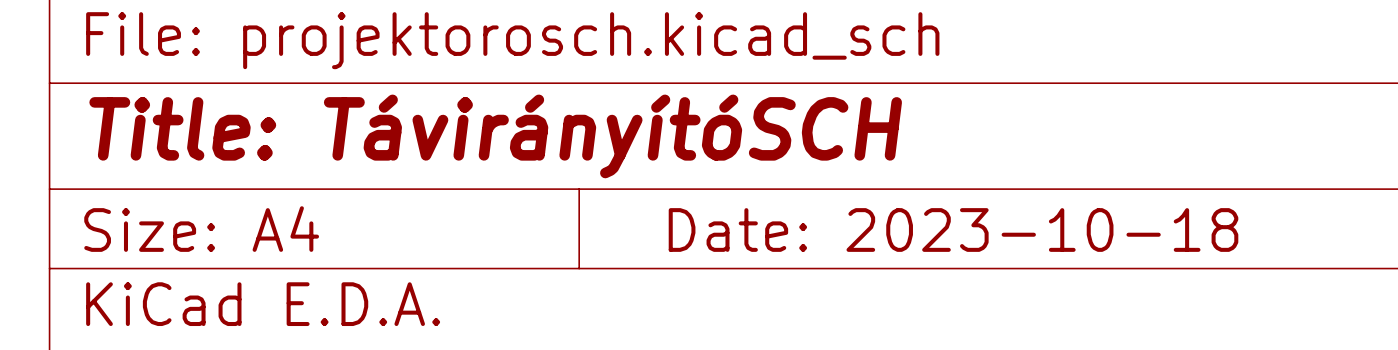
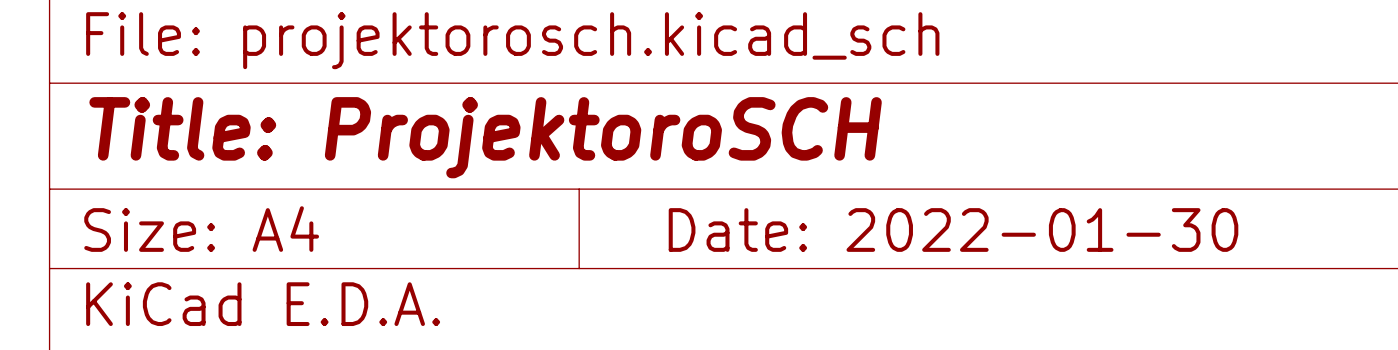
title block: Title: TávirányítóSCH (495, 136) -> Title: ProjektoroSCH (485, 137)
title block: Date: 2023-10-18 (953, 230) -> Date: 2022-01-30 (953, 230)

